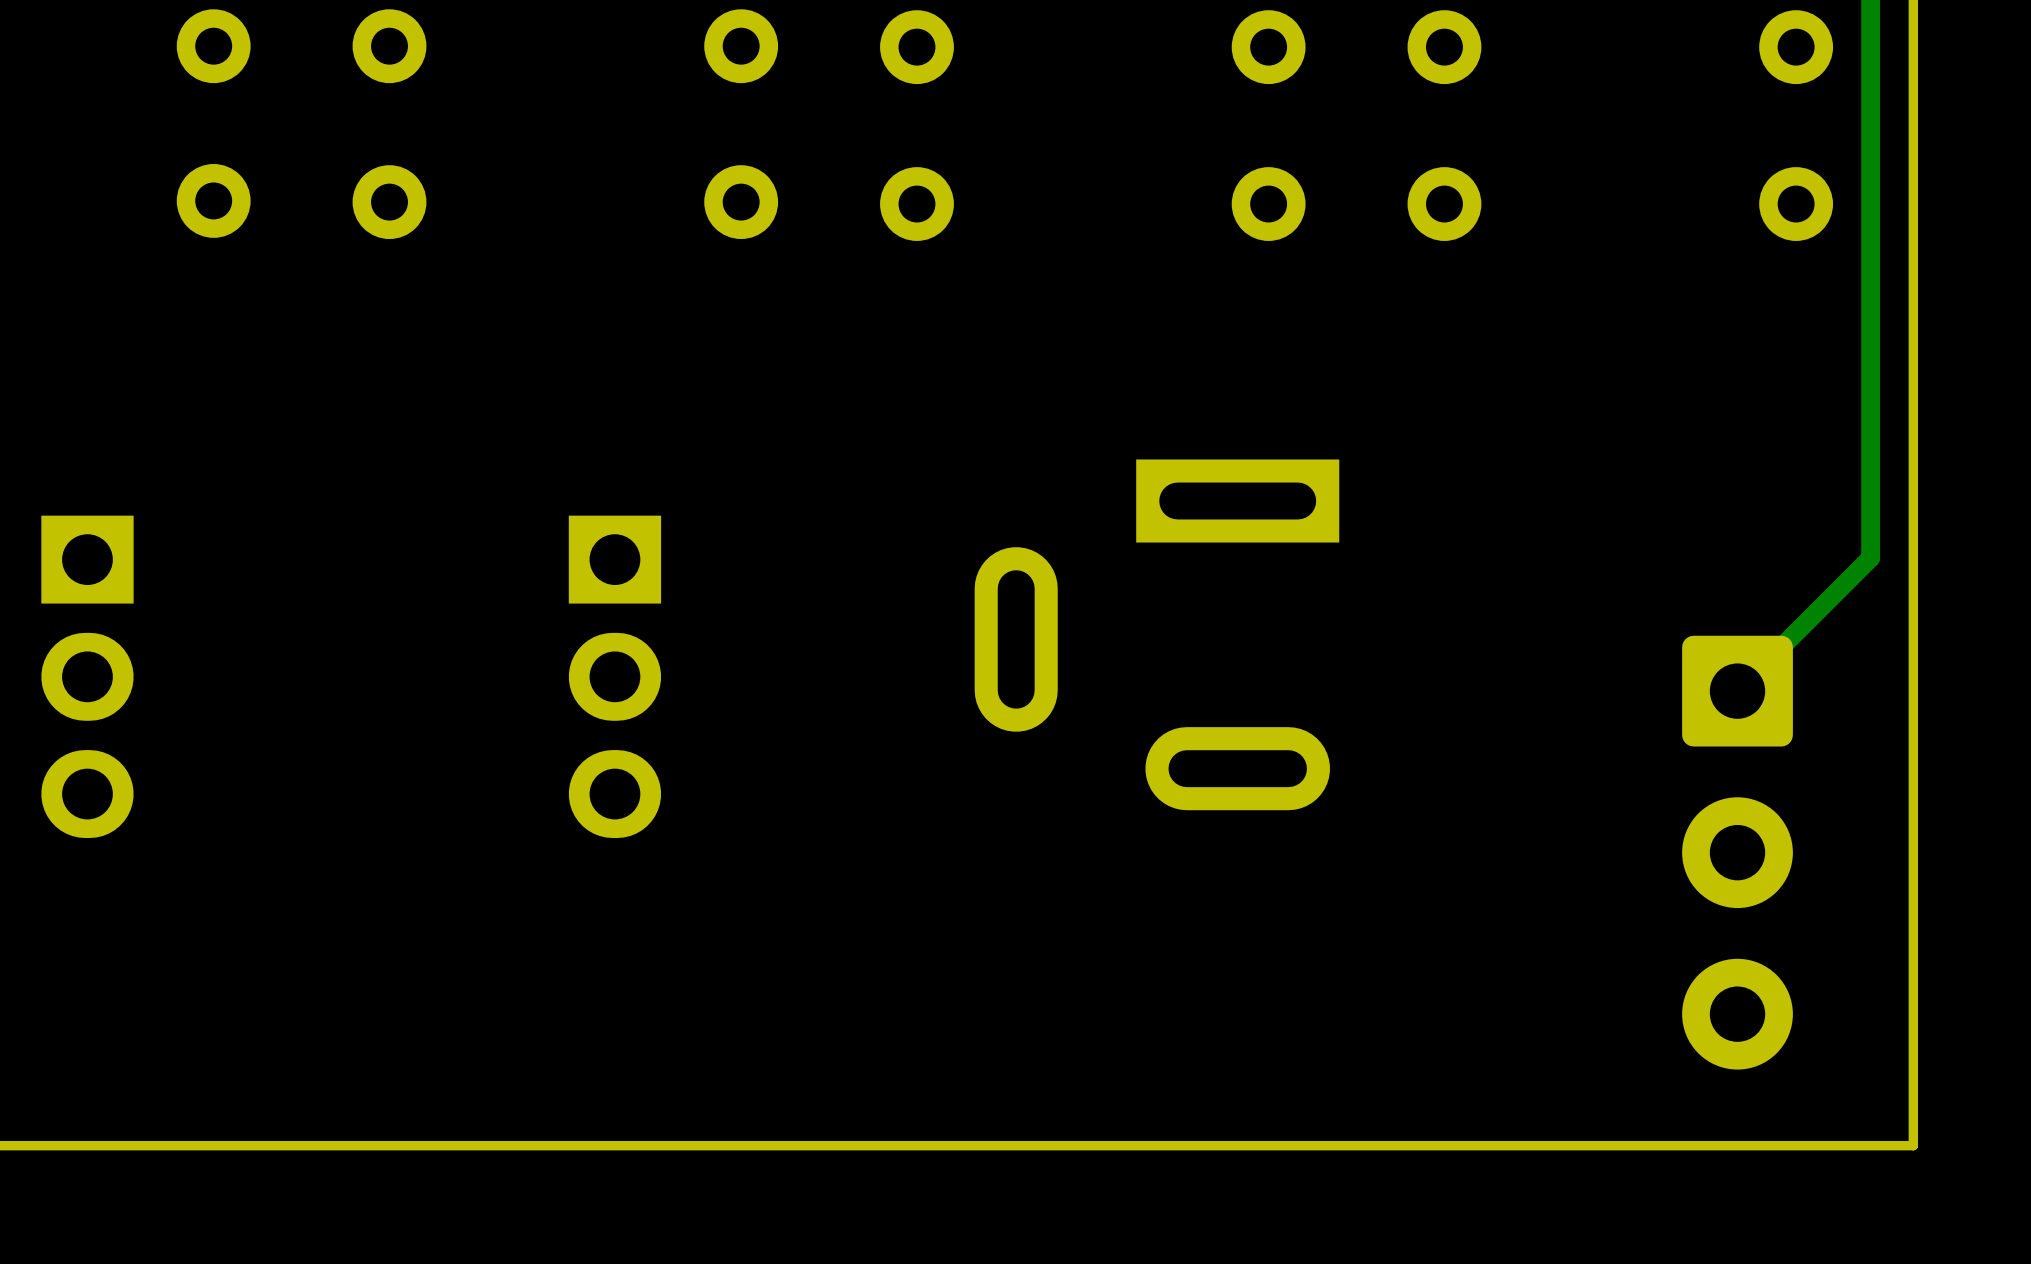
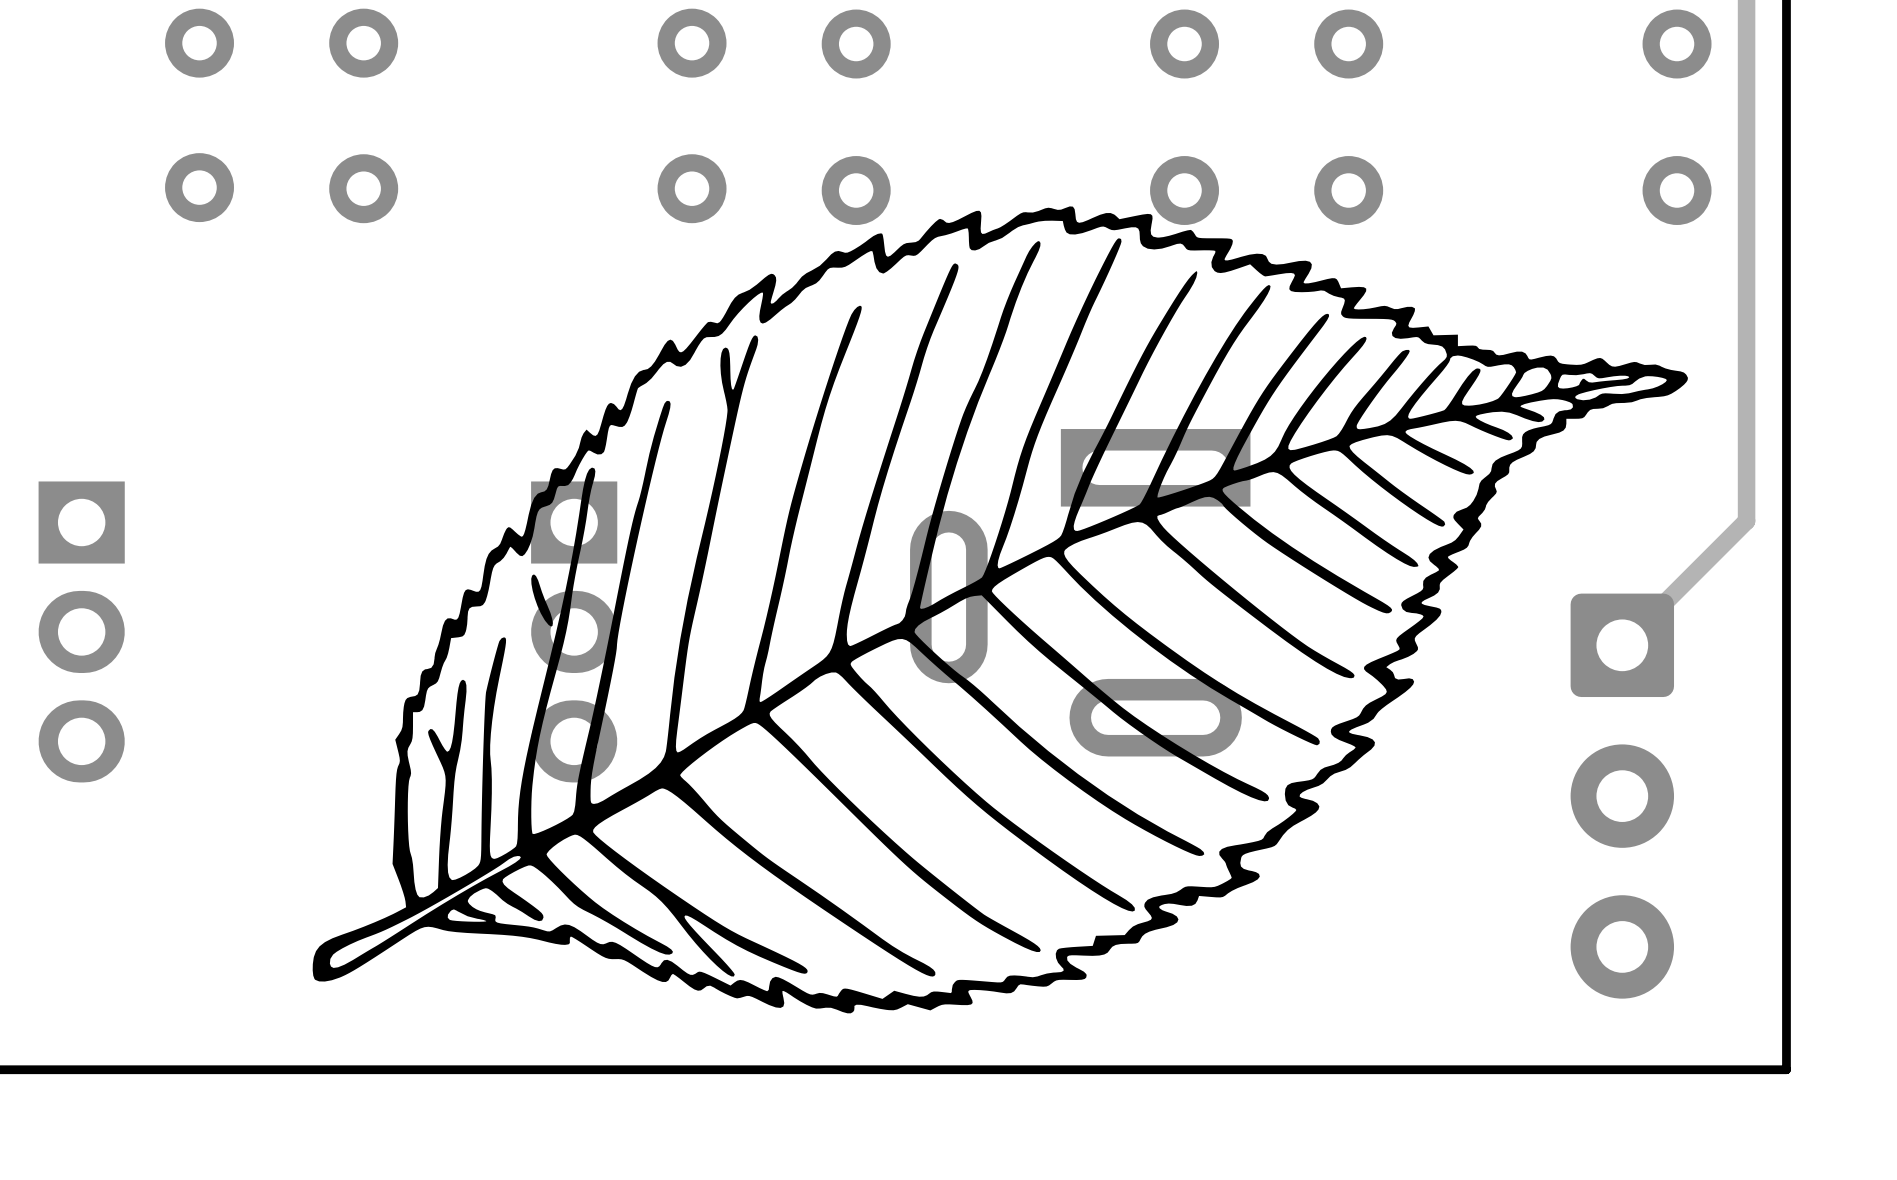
drawing: none -> [312, 206, 1688, 1014]

